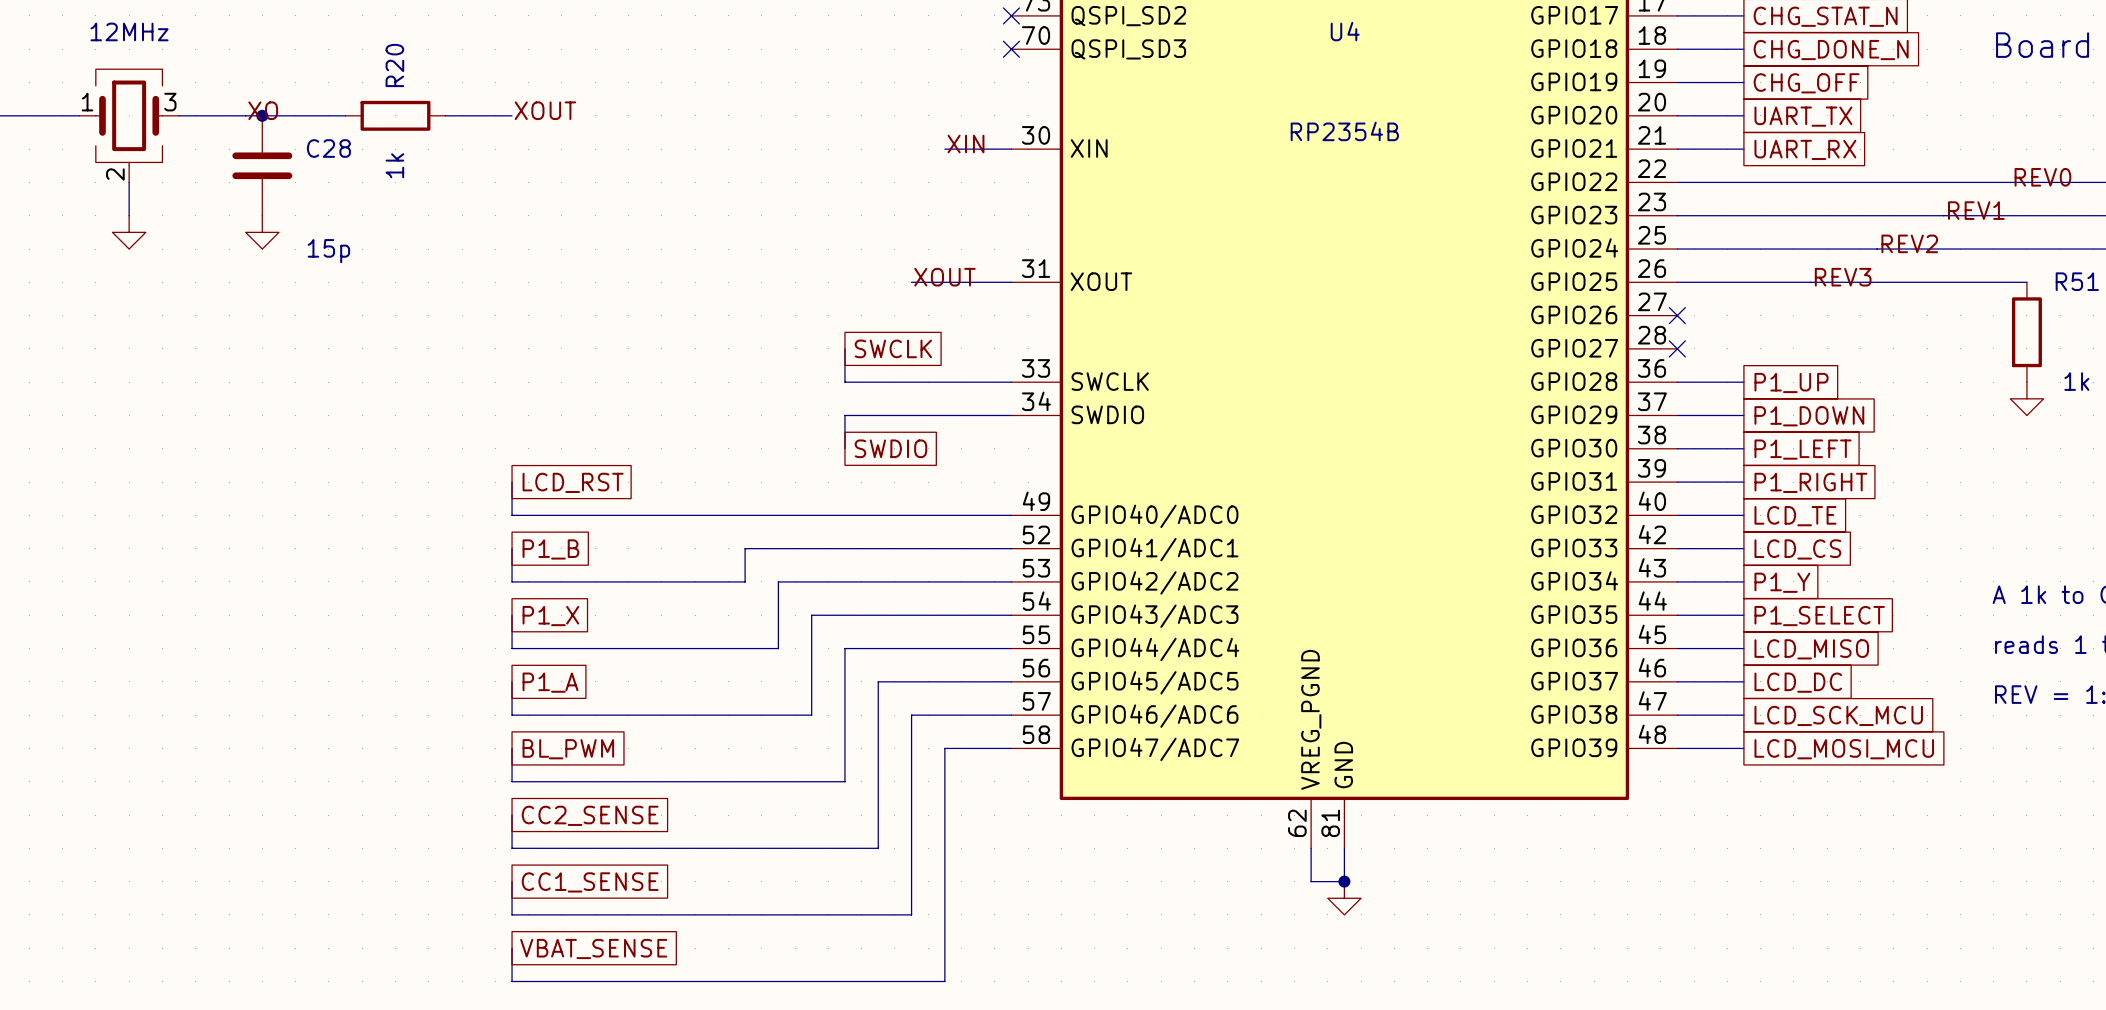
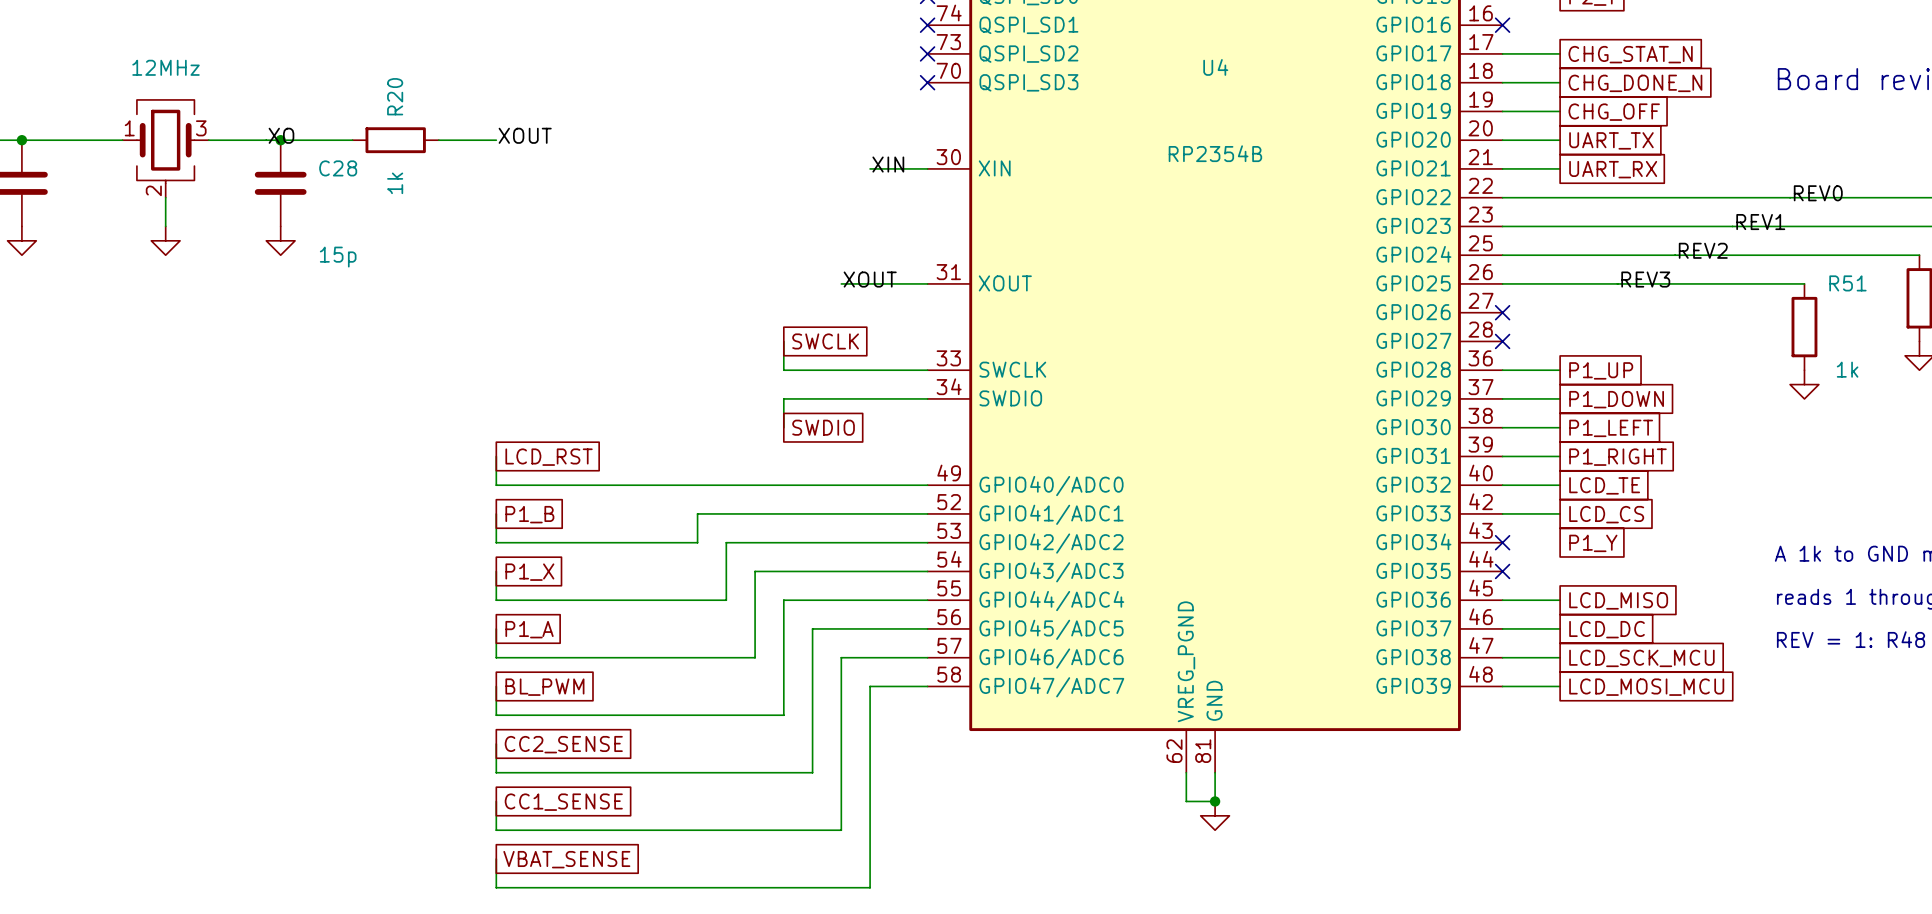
wire: (1677, 581) (1743, 581) -> none
no-connect mark: none -> (1502, 542)
wire: (1677, 615) (1743, 615) -> none
no-connect mark: none -> (1502, 571)
global label: P1_SELECT (1819, 616) -> none

